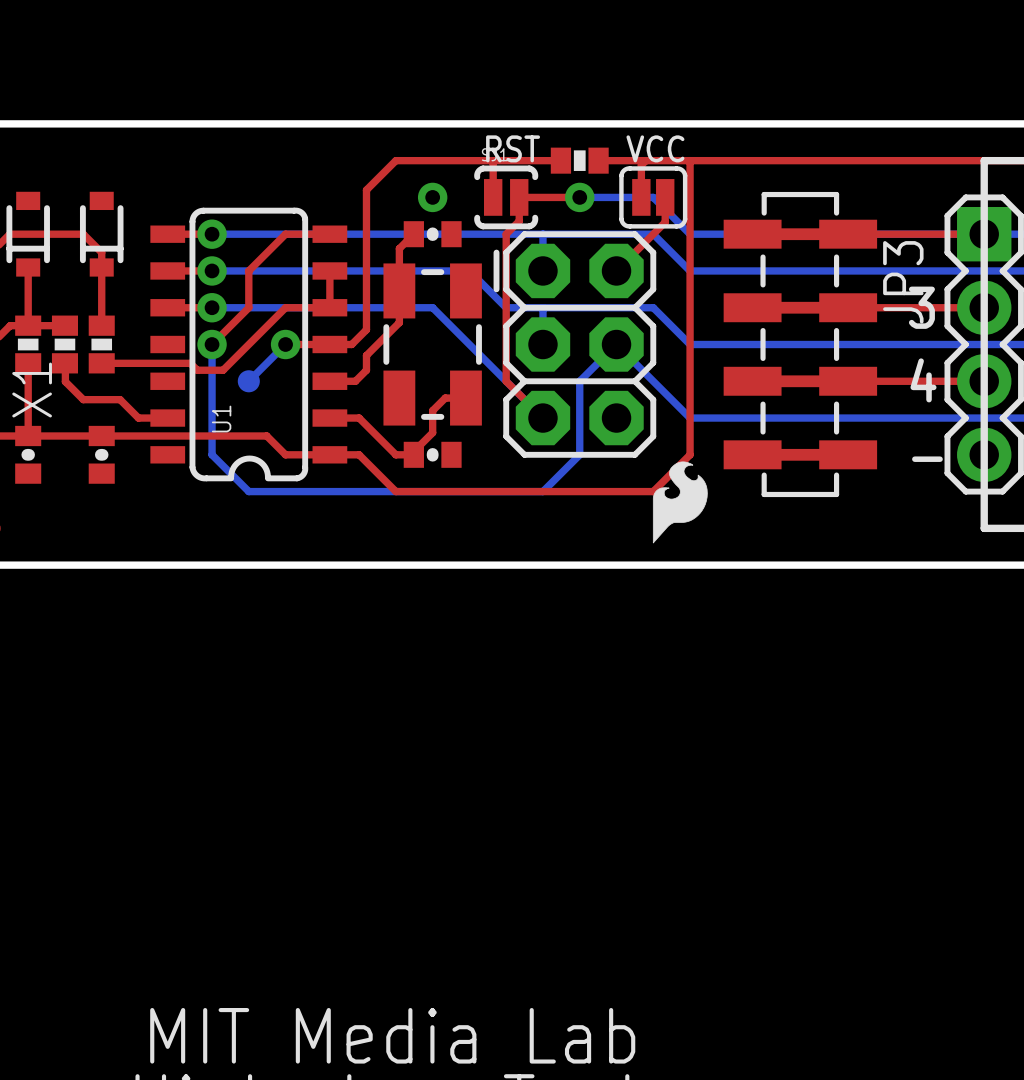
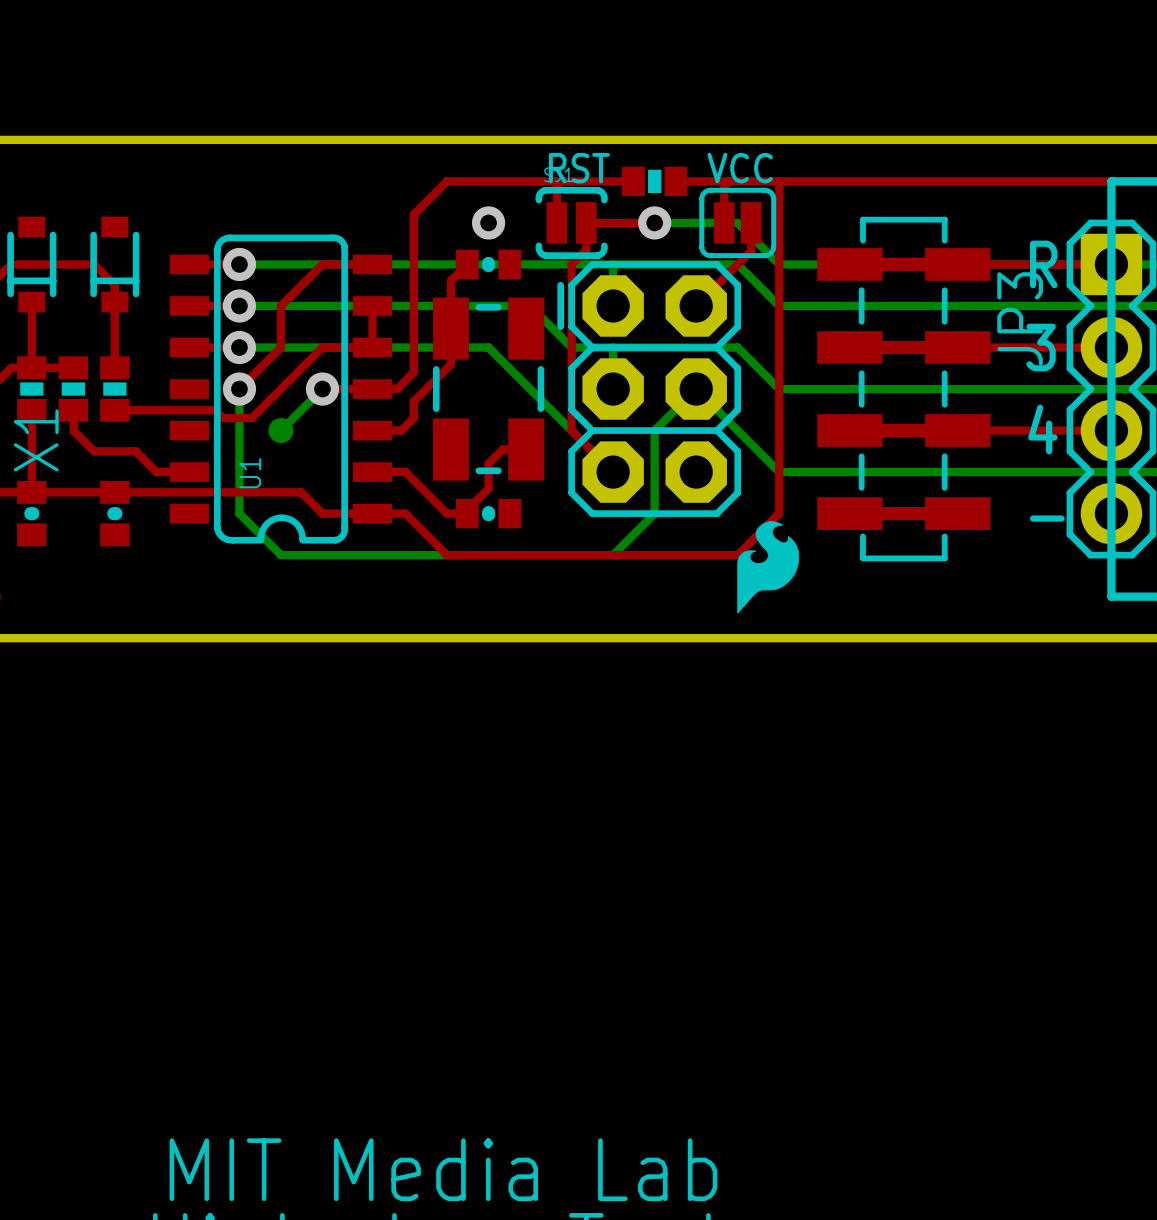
text: none -> R (1043, 264)

